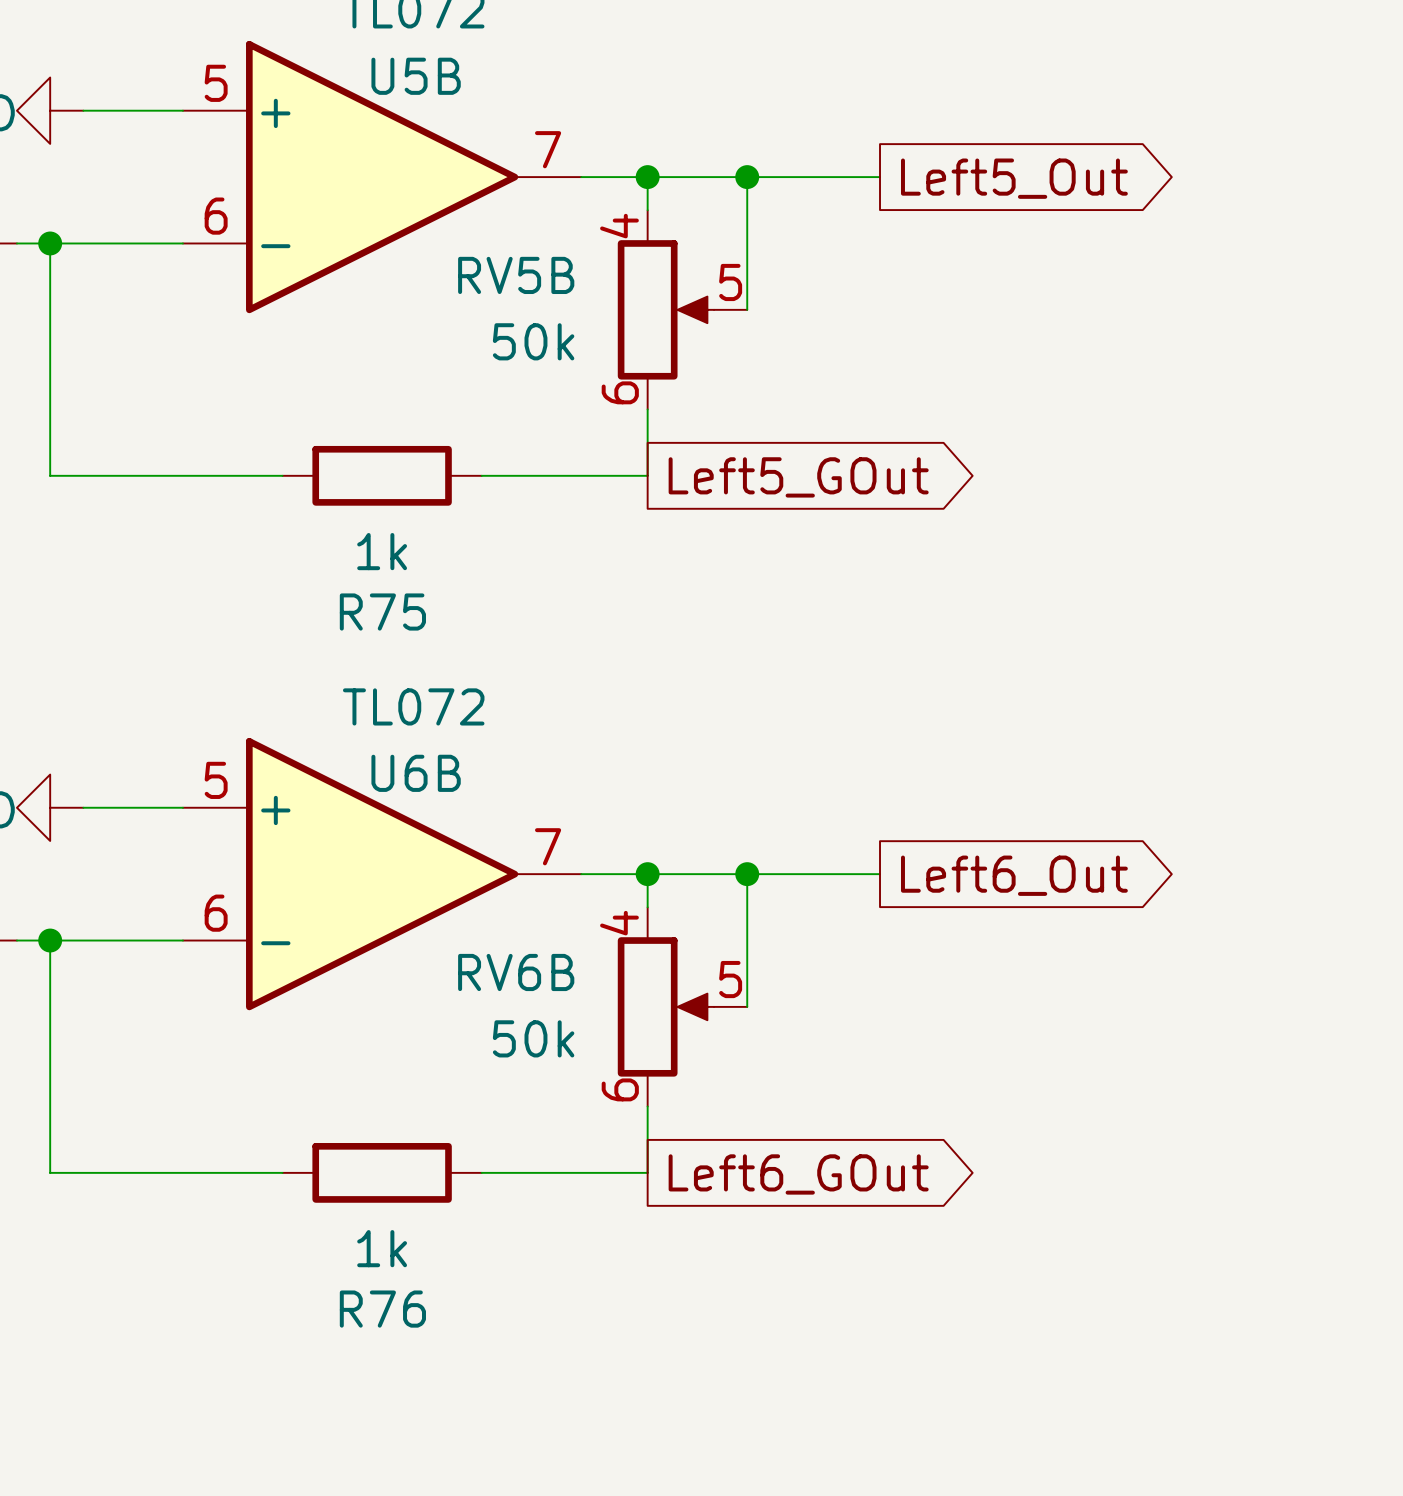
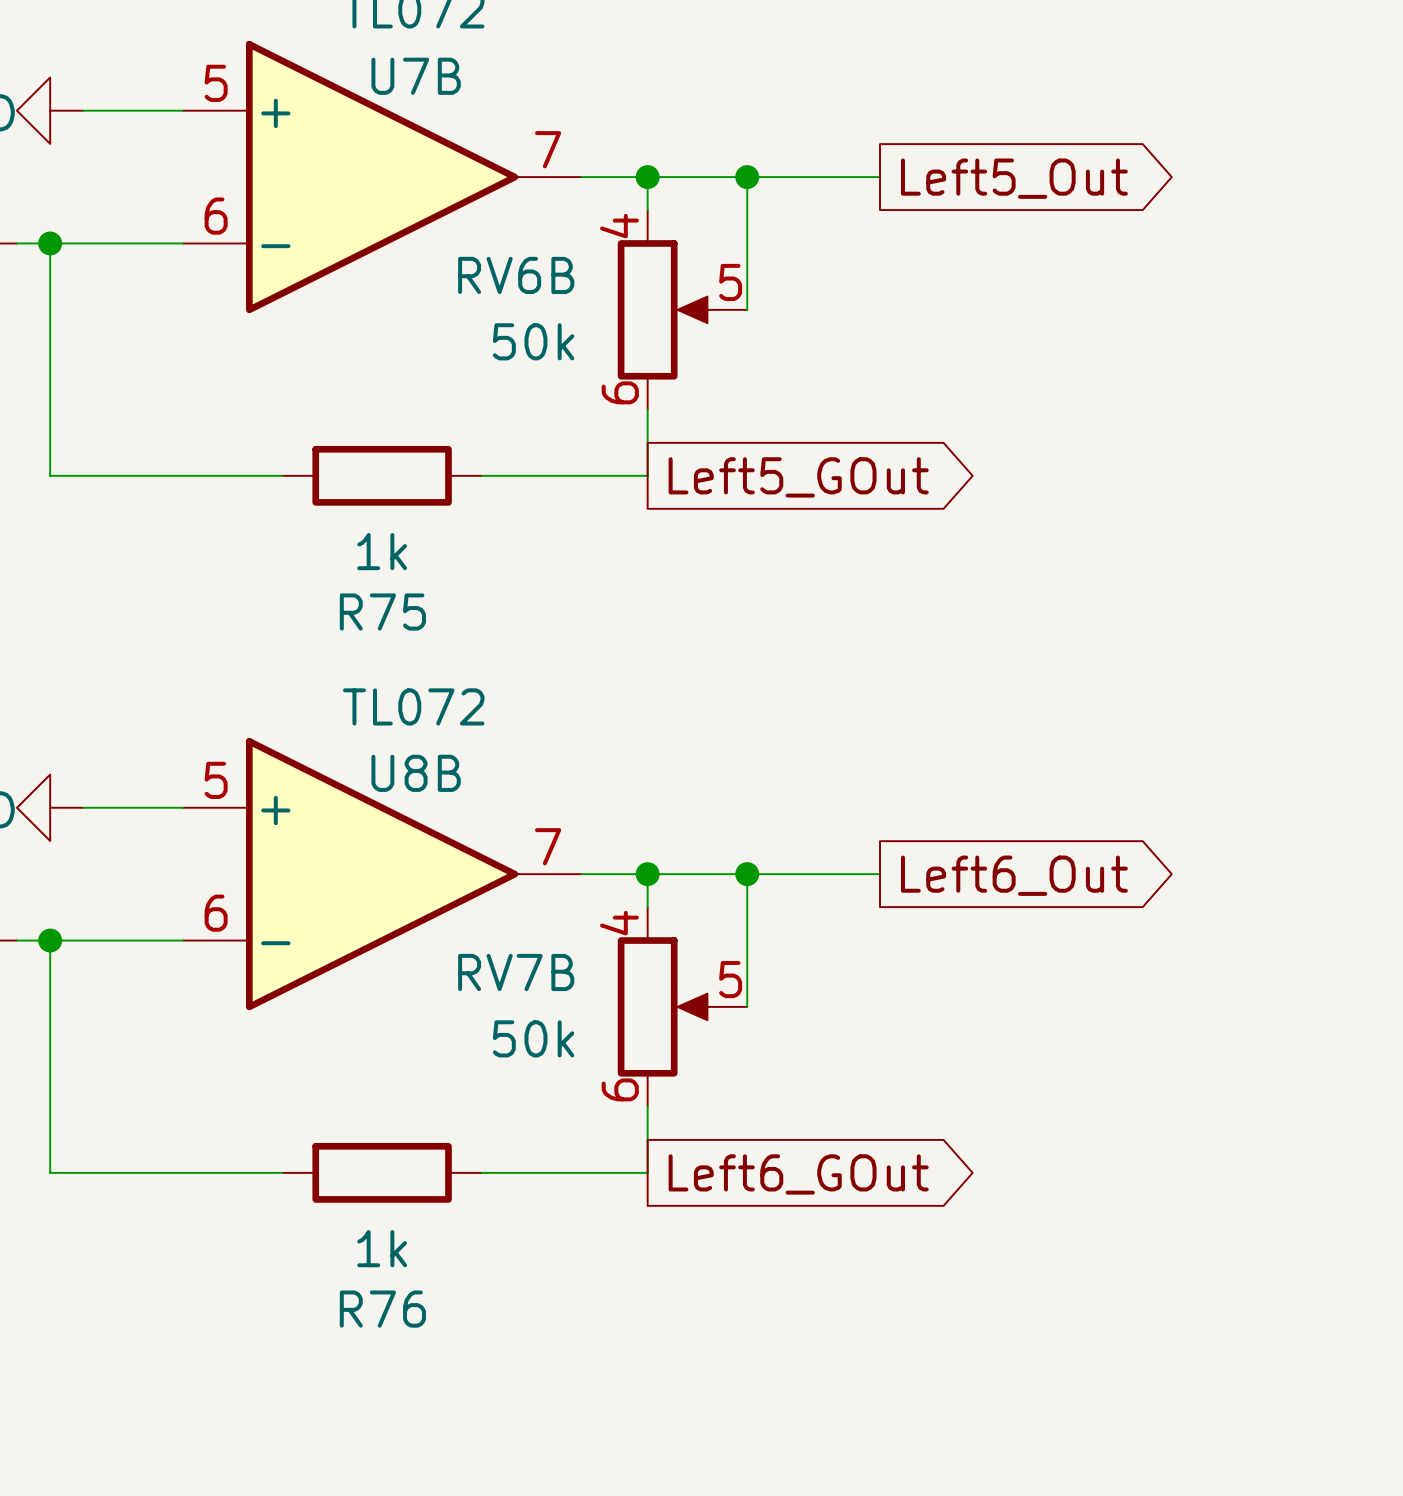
U5B name: U5B (416, 76) -> U7B (416, 76)
RV5B name: RV5B (516, 275) -> RV6B (516, 275)
U6B name: U6B (416, 773) -> U8B (416, 773)
RV6B name: RV6B (516, 972) -> RV7B (516, 972)

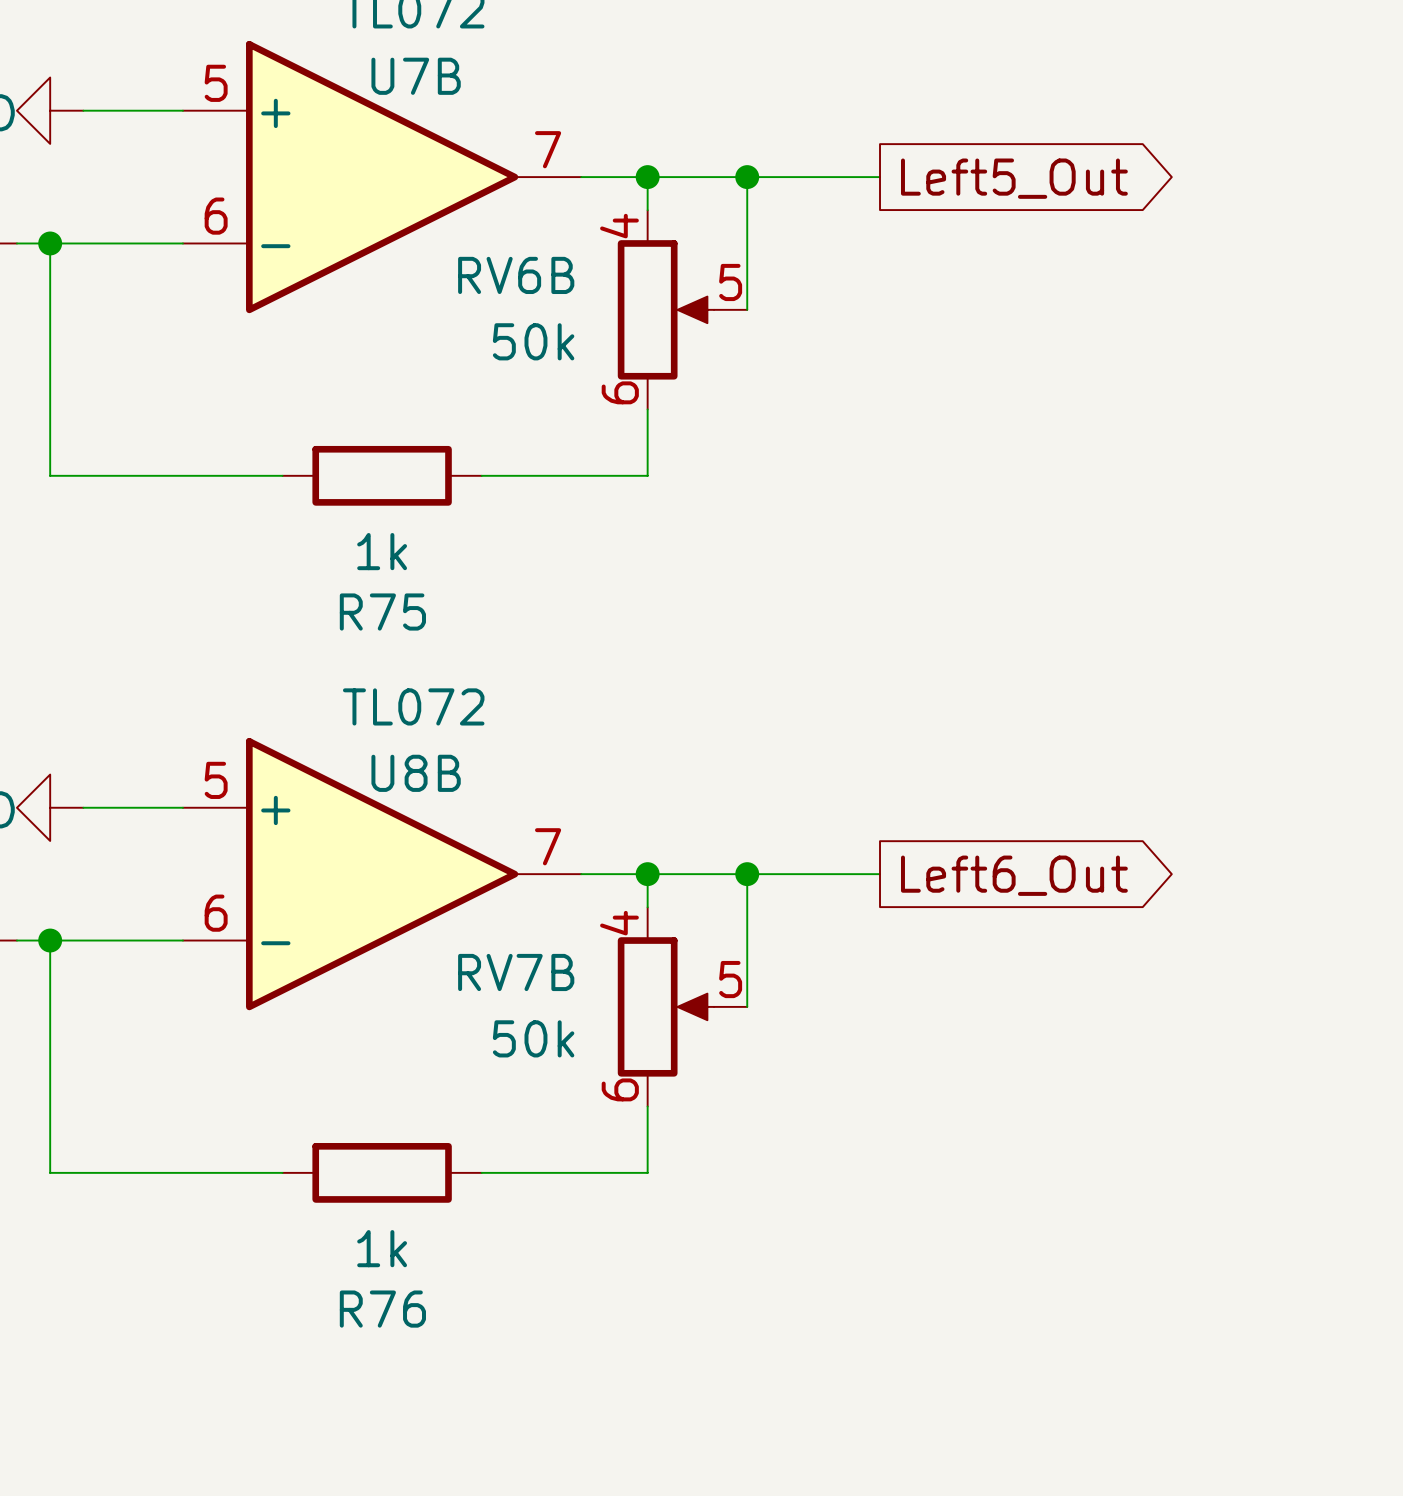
global label: Left5_GOut (798, 477) -> none
global label: Left6_GOut (798, 1174) -> none

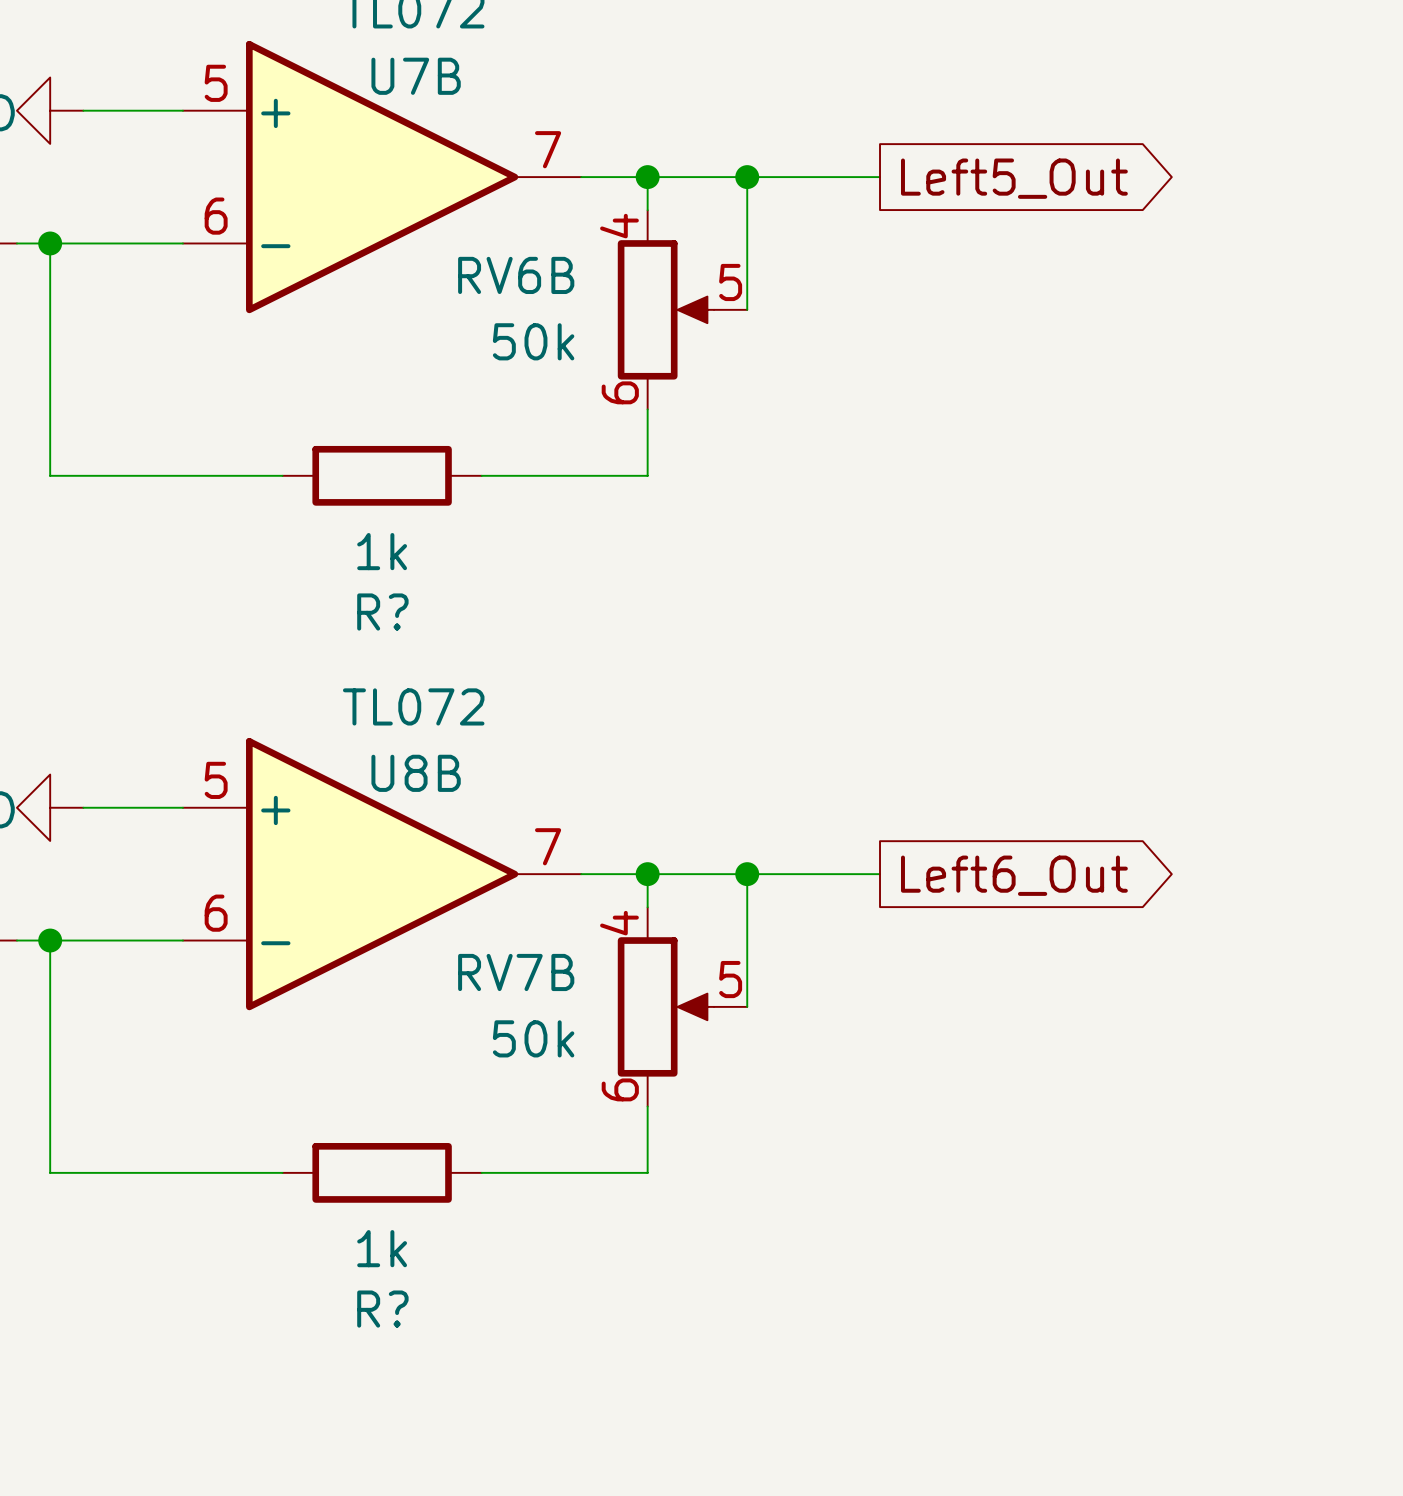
R75 name: R75 (382, 612) -> R? (382, 612)
R76 name: R76 (382, 1309) -> R? (382, 1309)

